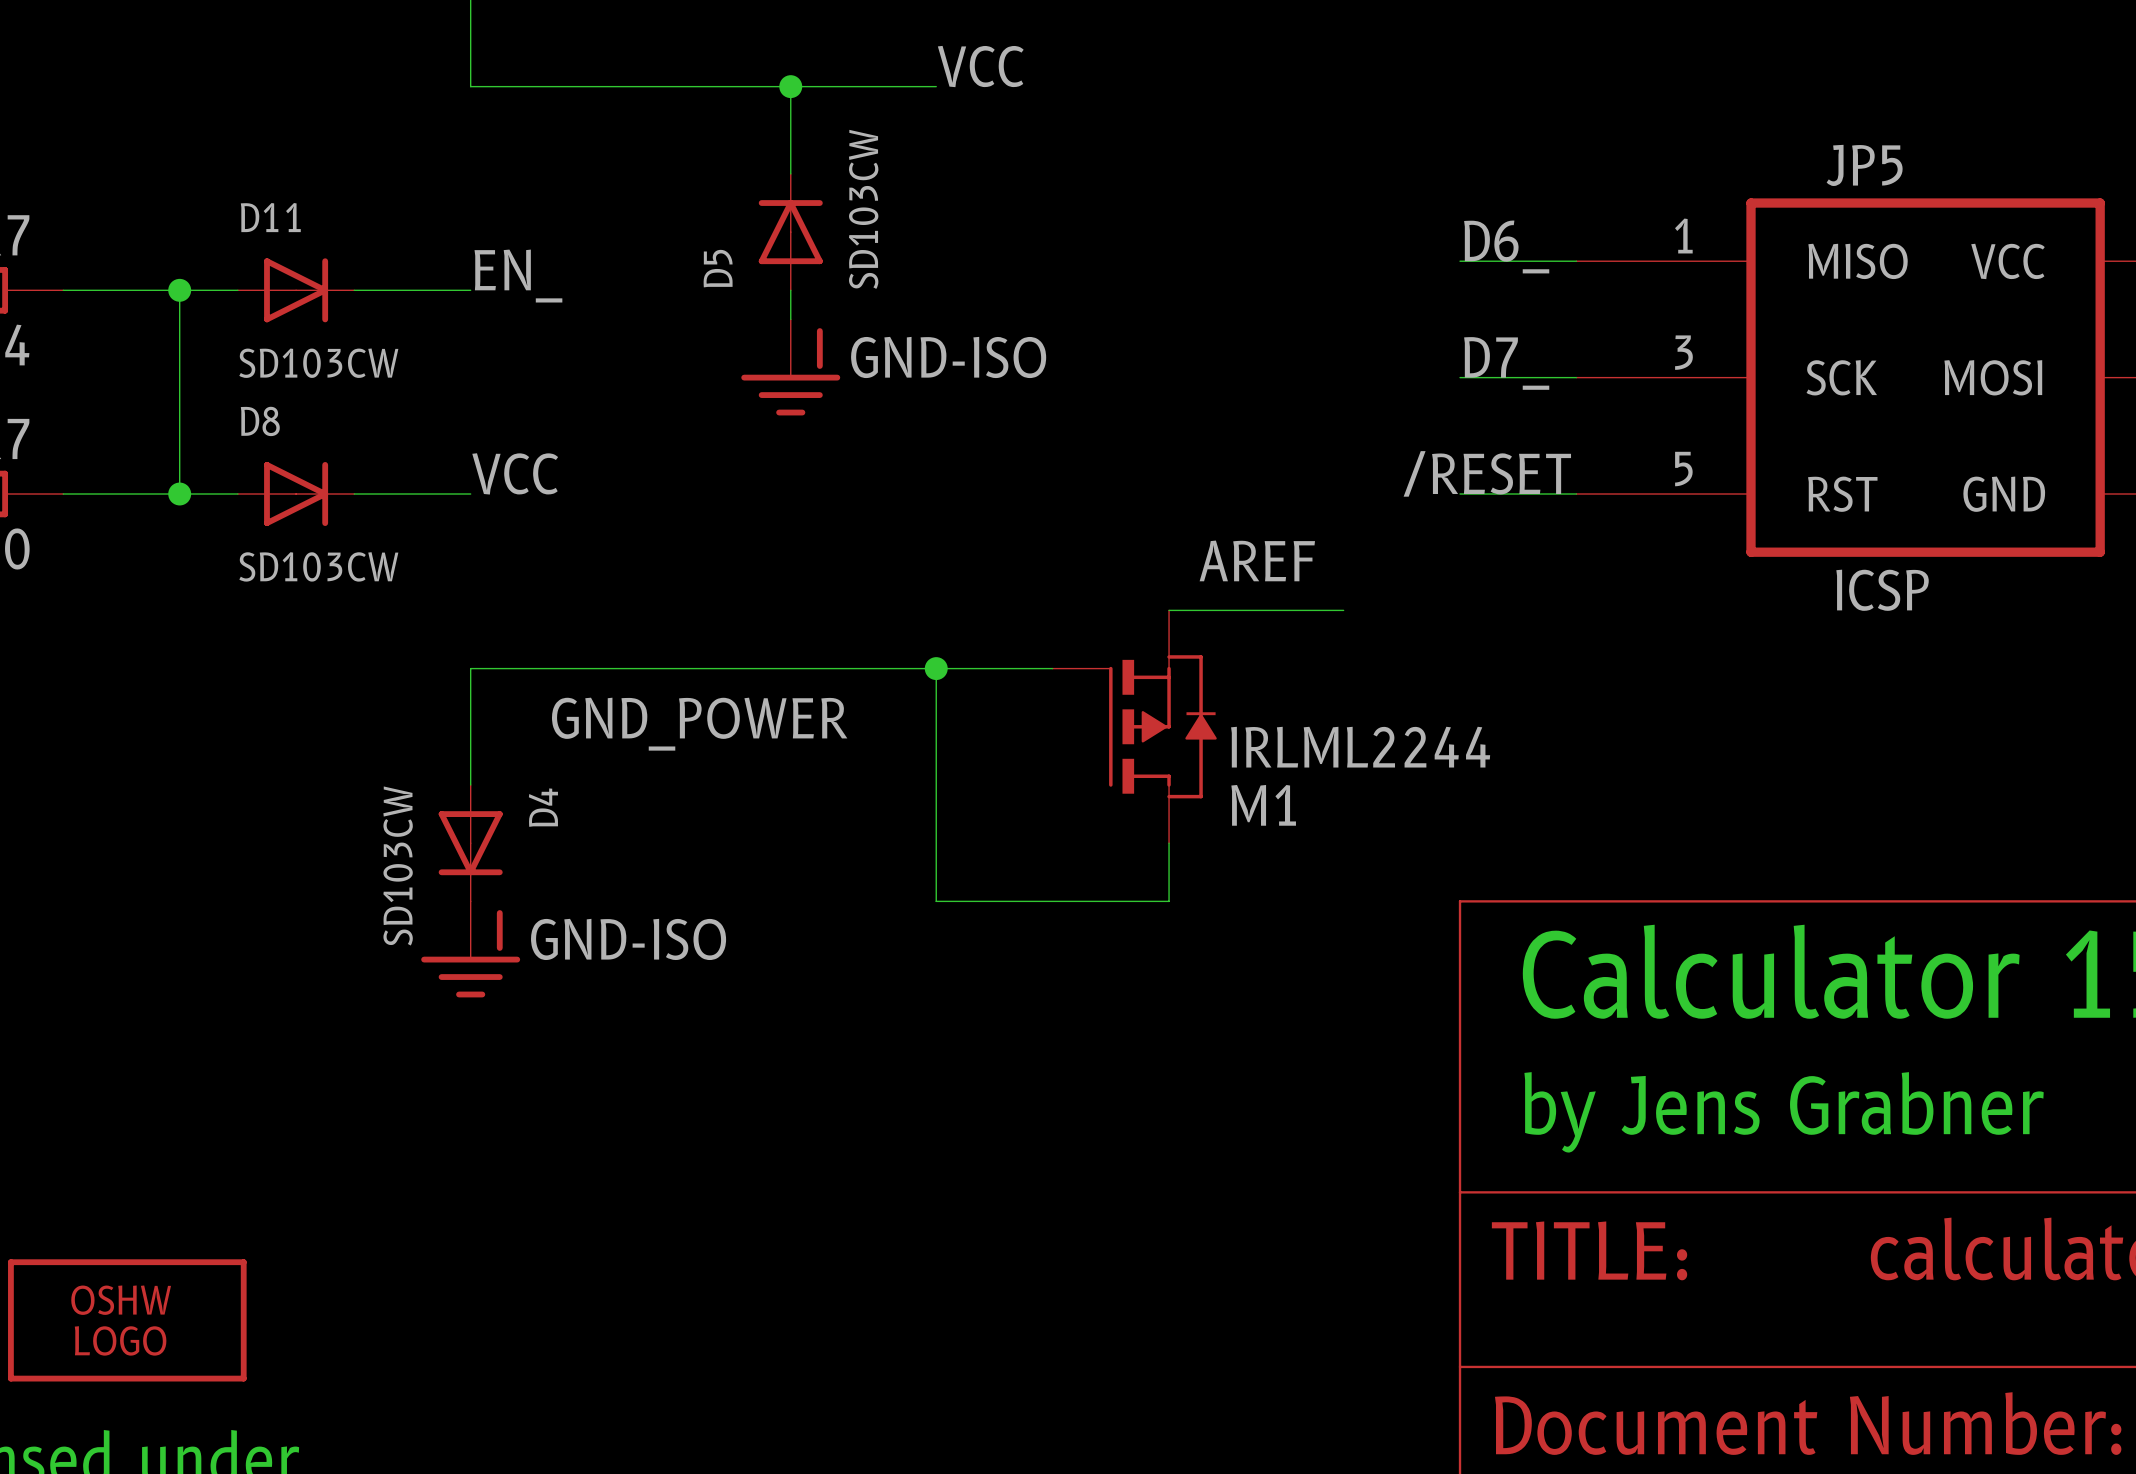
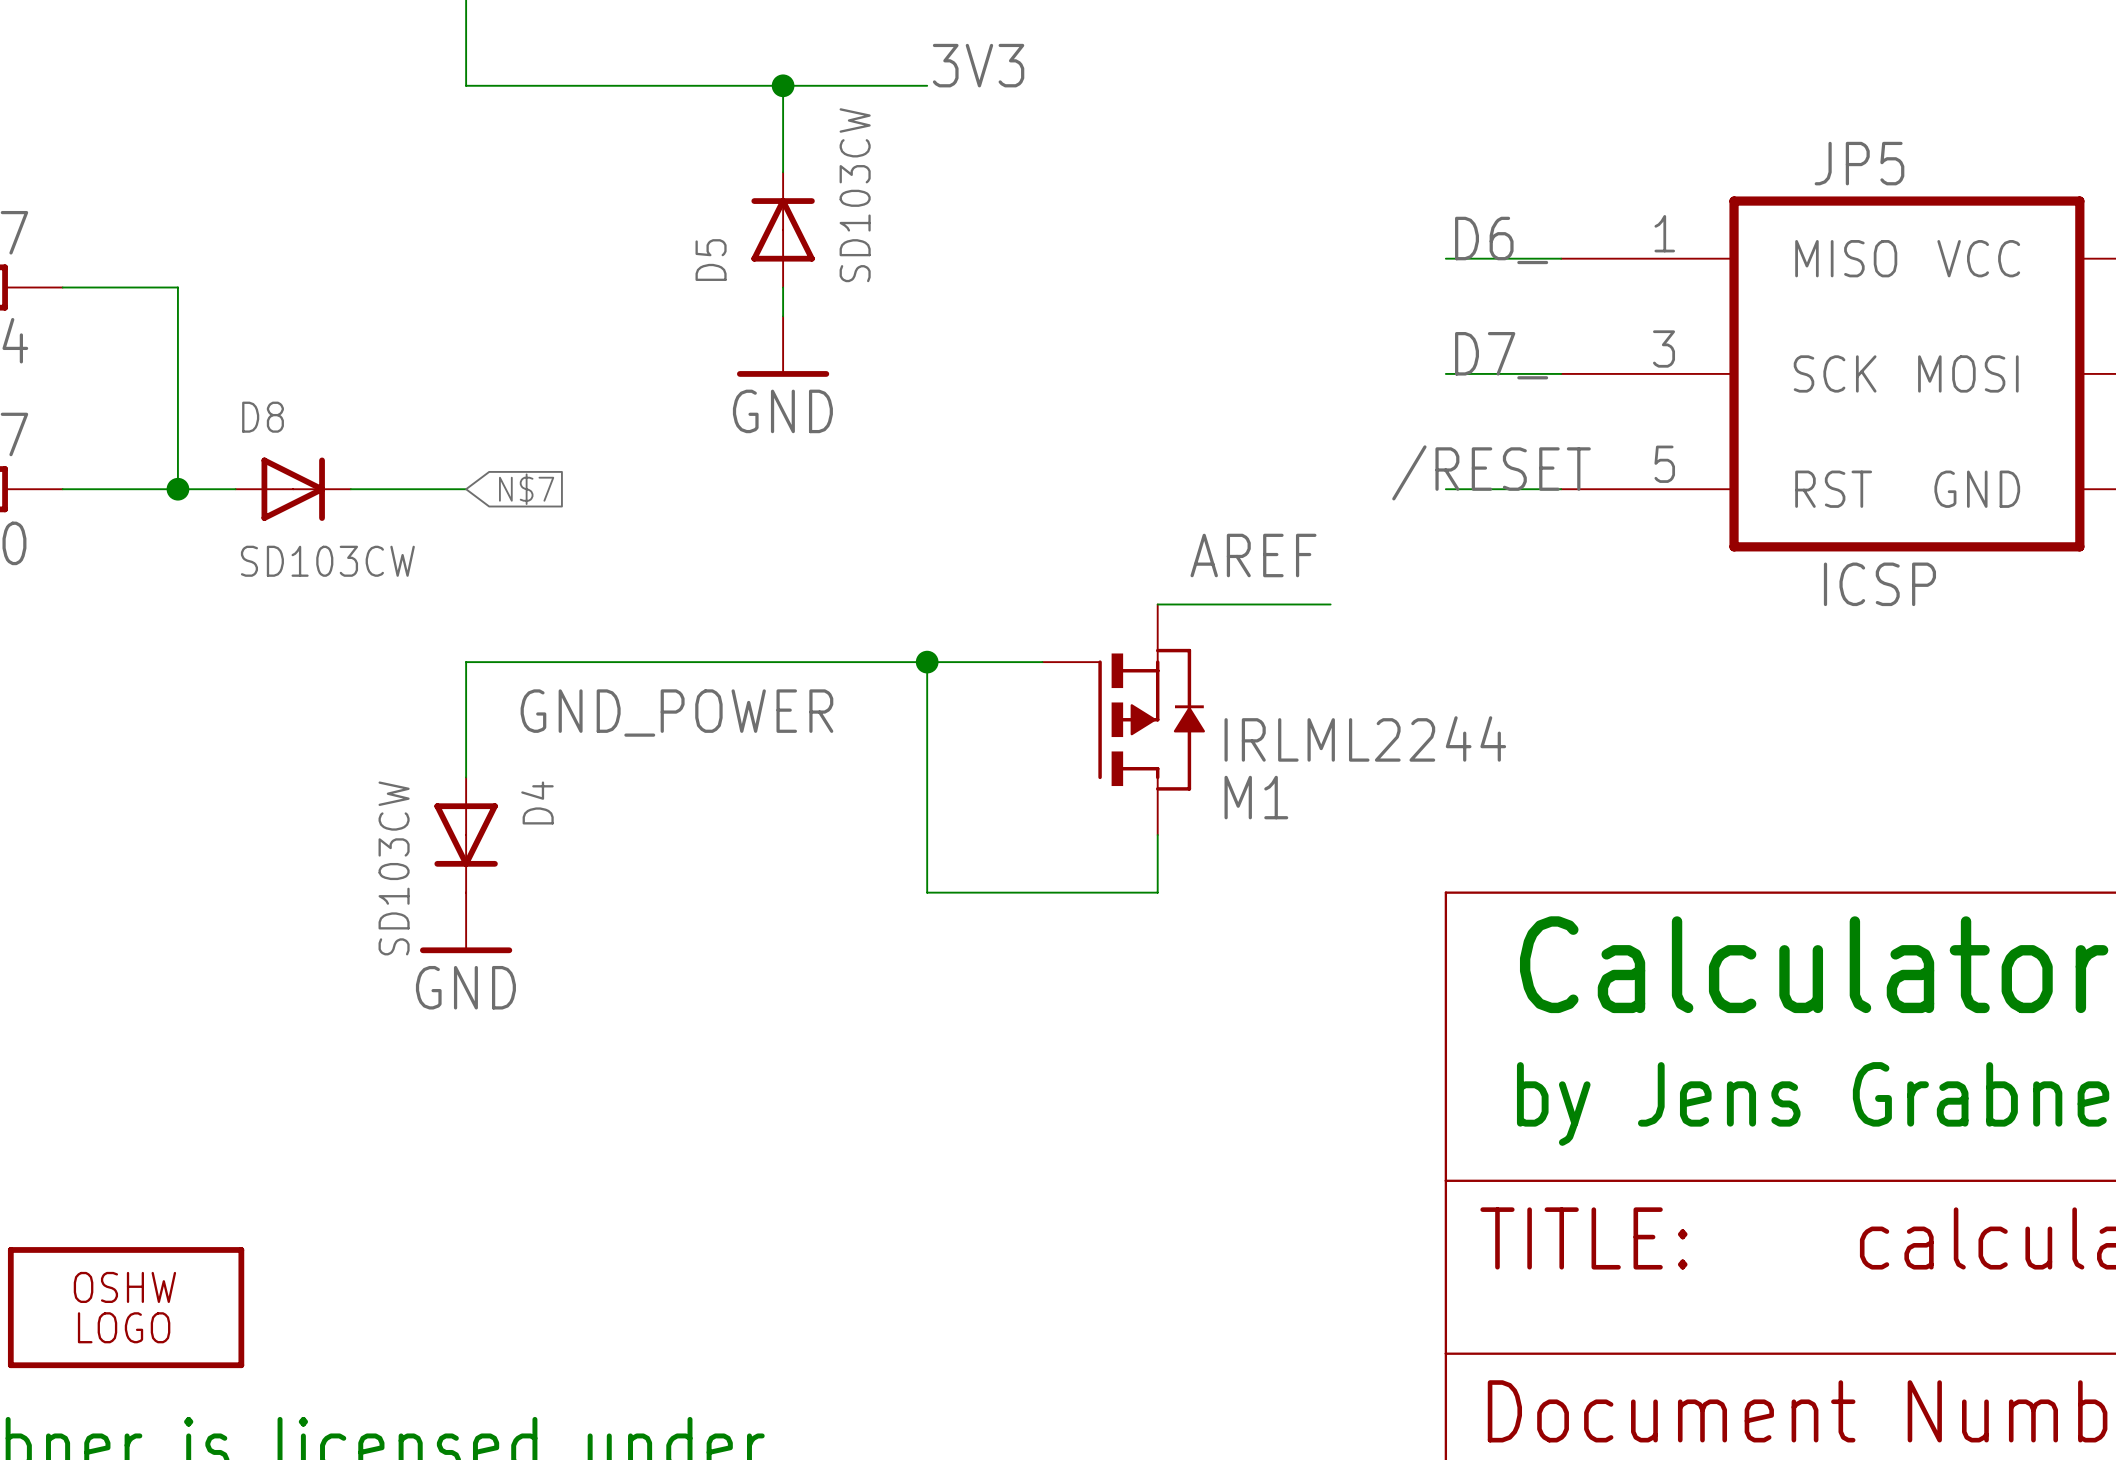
label: VCC (980, 66) -> 3V3 (978, 65)
label: EN_ (518, 276) -> none
wire: (179, 290) (237, 290) -> none
junction: (179, 290) -> none
D11: SD103CW (296, 290) -> none
wire: (354, 290) (470, 290) -> none
power symbol: GND-ISO (790, 367) -> GND (783, 346)
label: VCC (515, 473) -> none
global label: none -> N$7 (526, 489)
power symbol: GND-ISO (470, 949) -> GND (466, 922)

